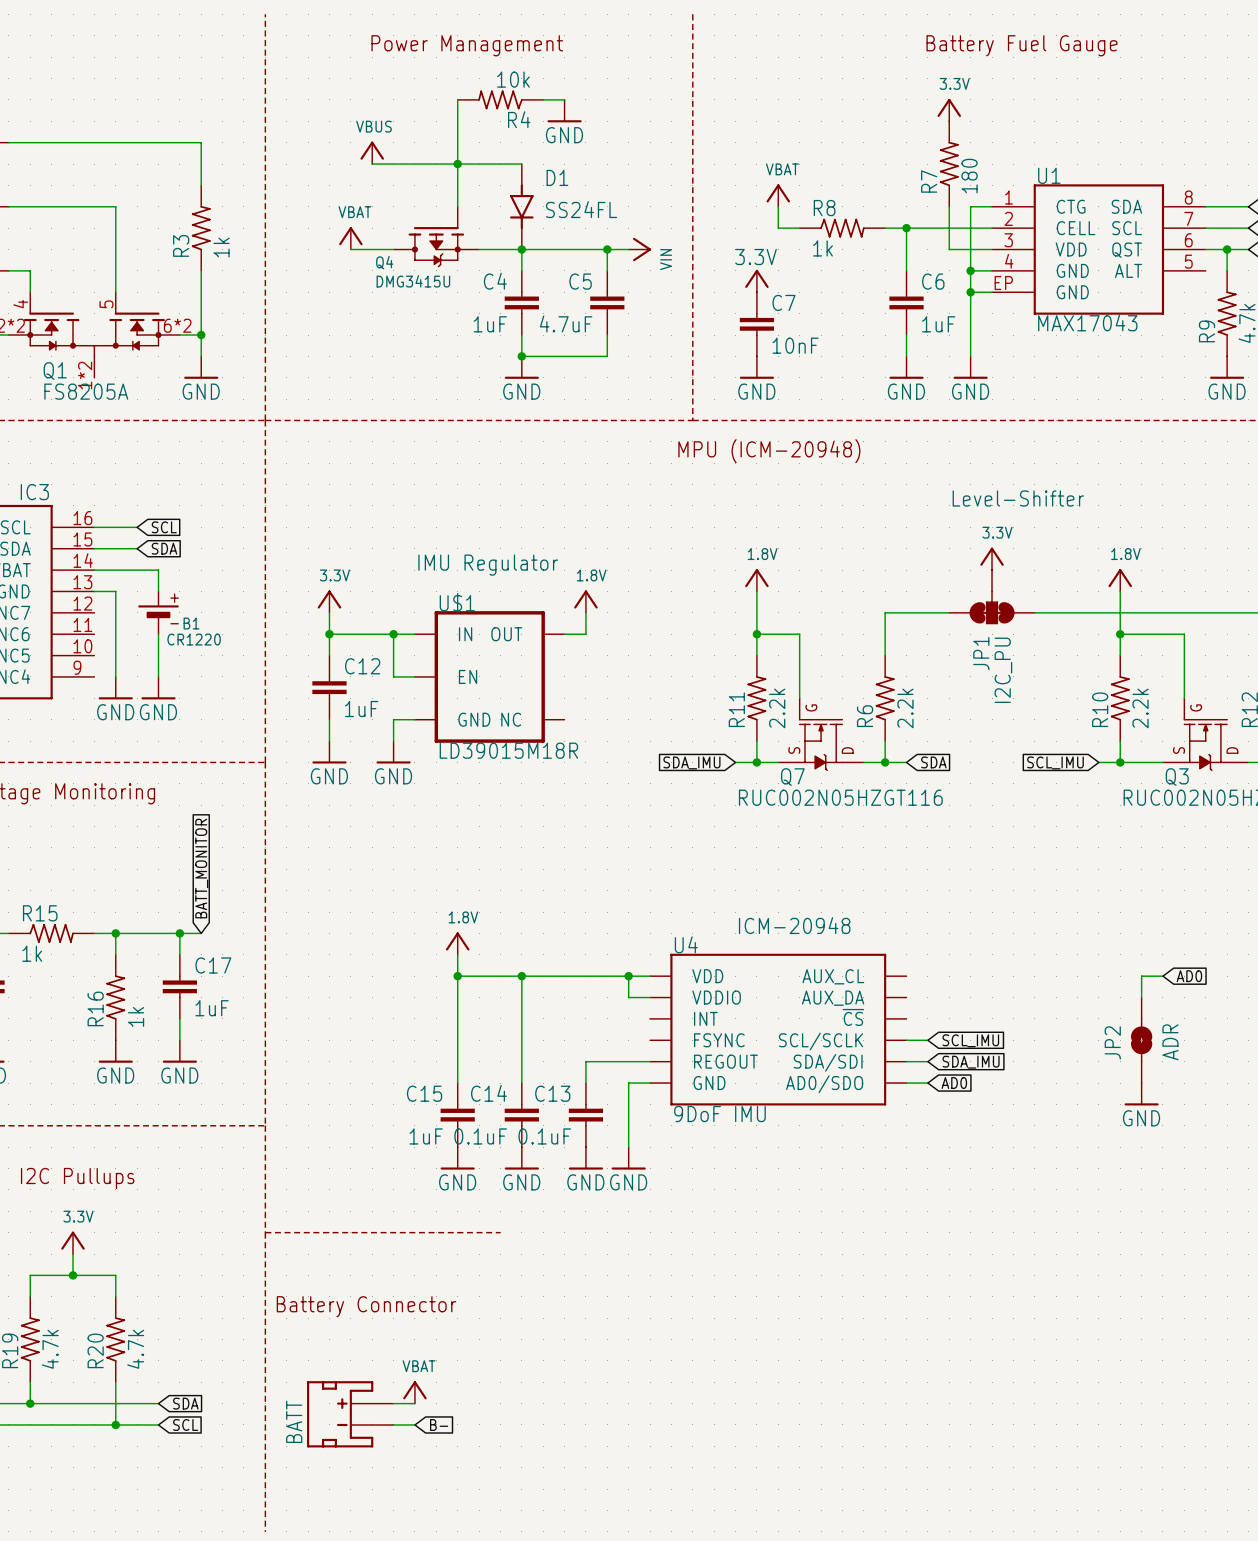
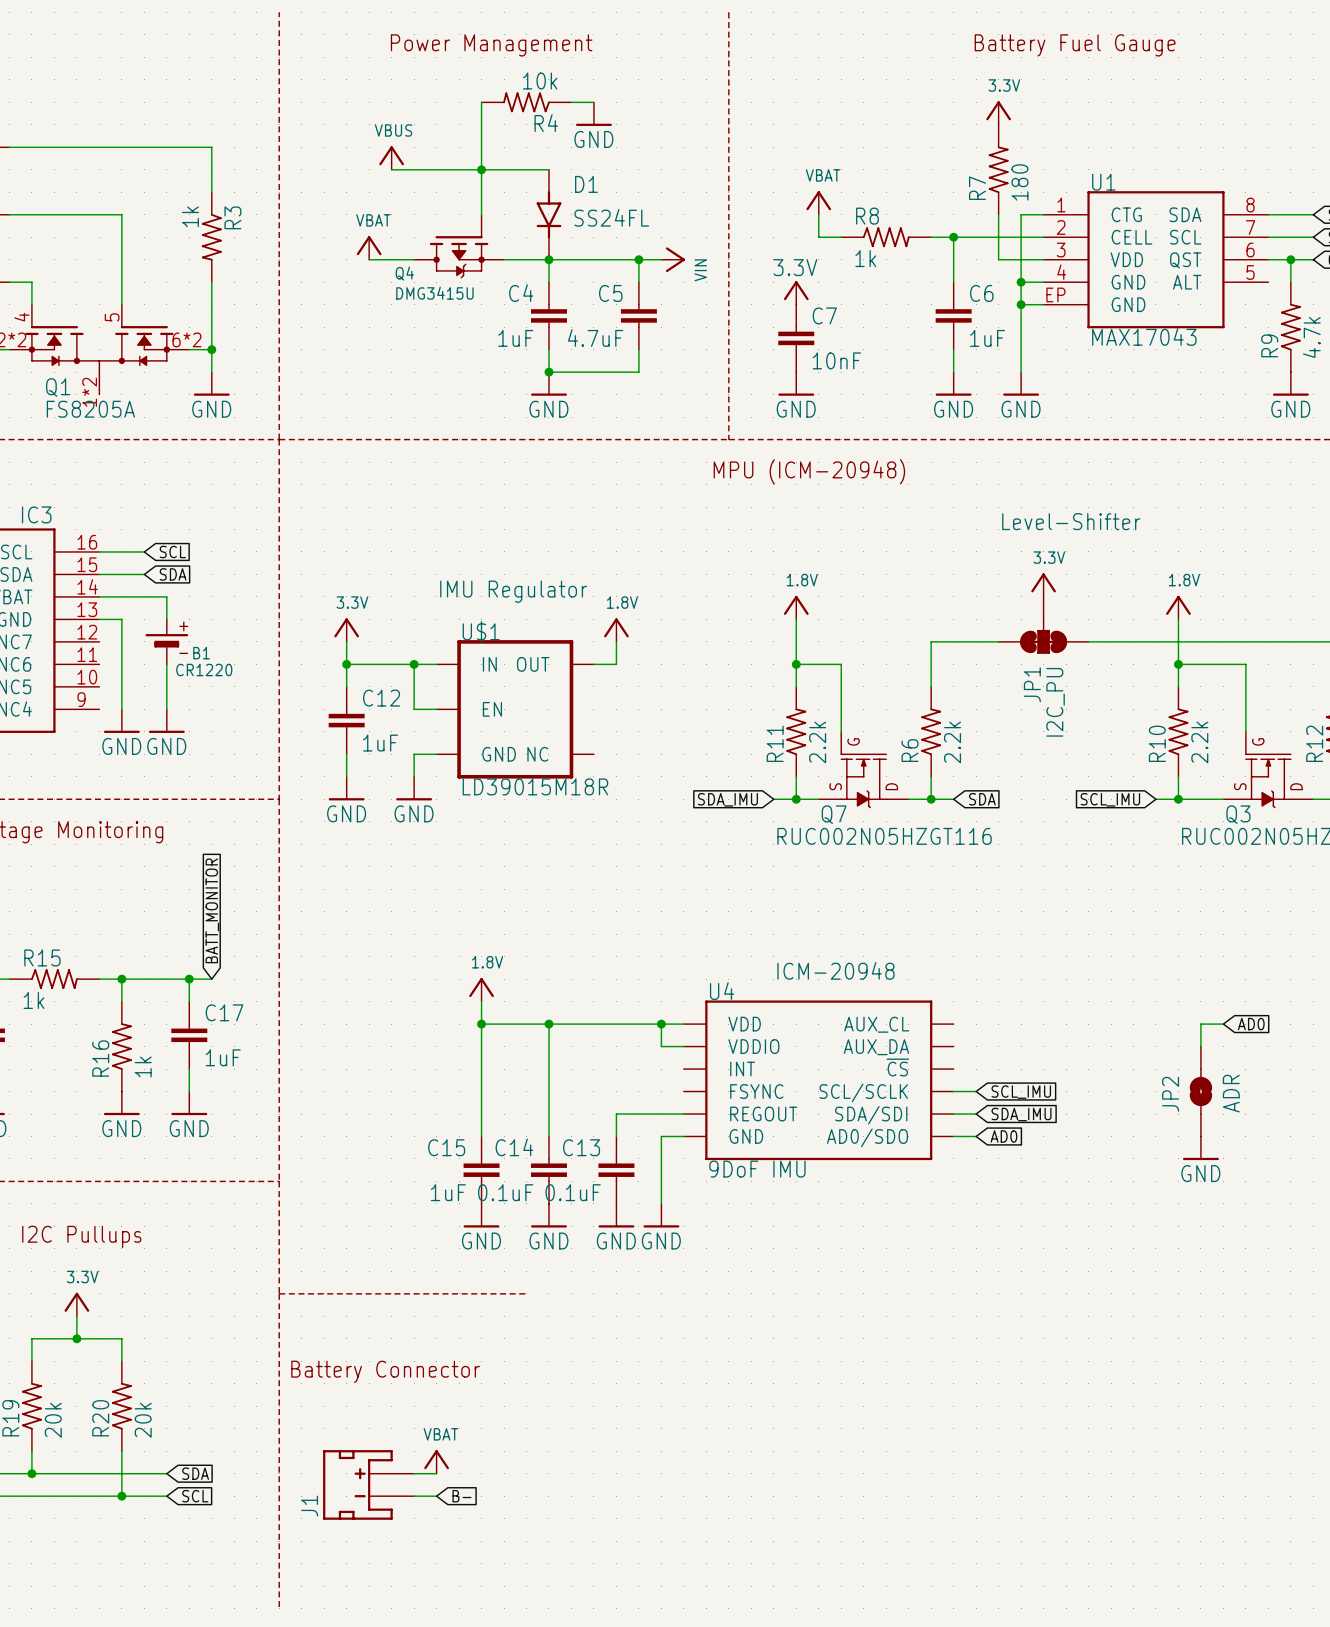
R3 rotation: 0° (201, 228) -> 180° (211, 237)
R19 value: 4.7k (50, 1349) -> 20k (53, 1420)
R20 value: 4.7k (135, 1349) -> 20k (143, 1420)
BATT name: BATT (294, 1421) -> J1 (309, 1506)

